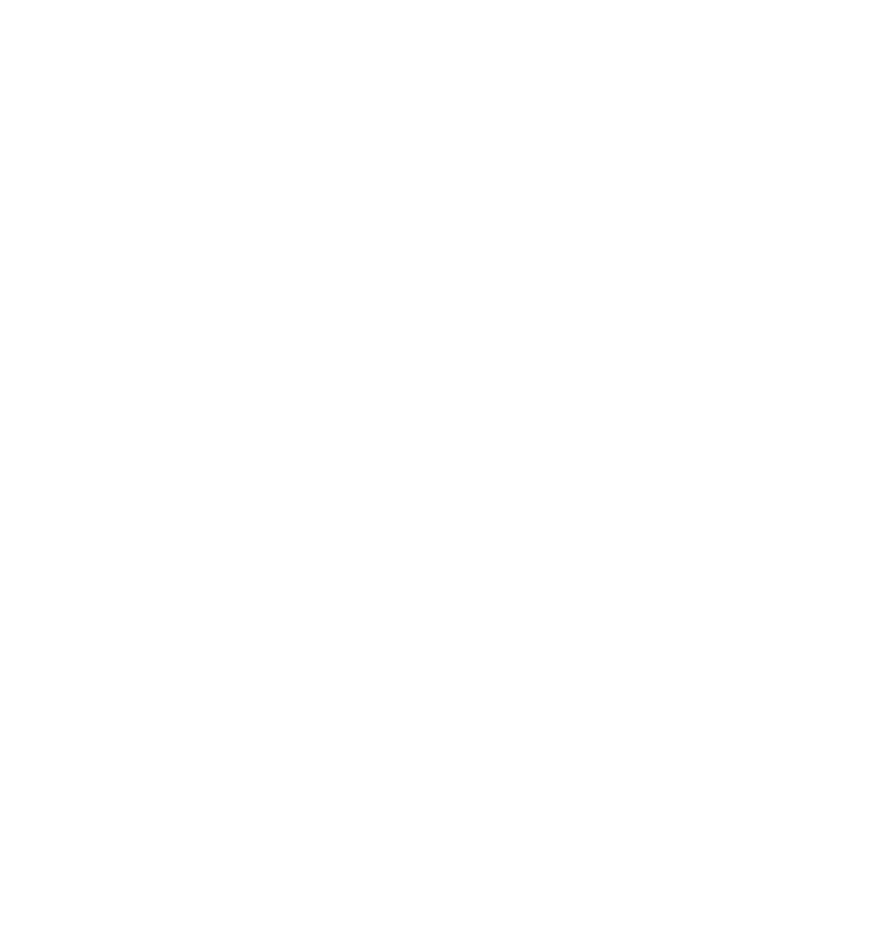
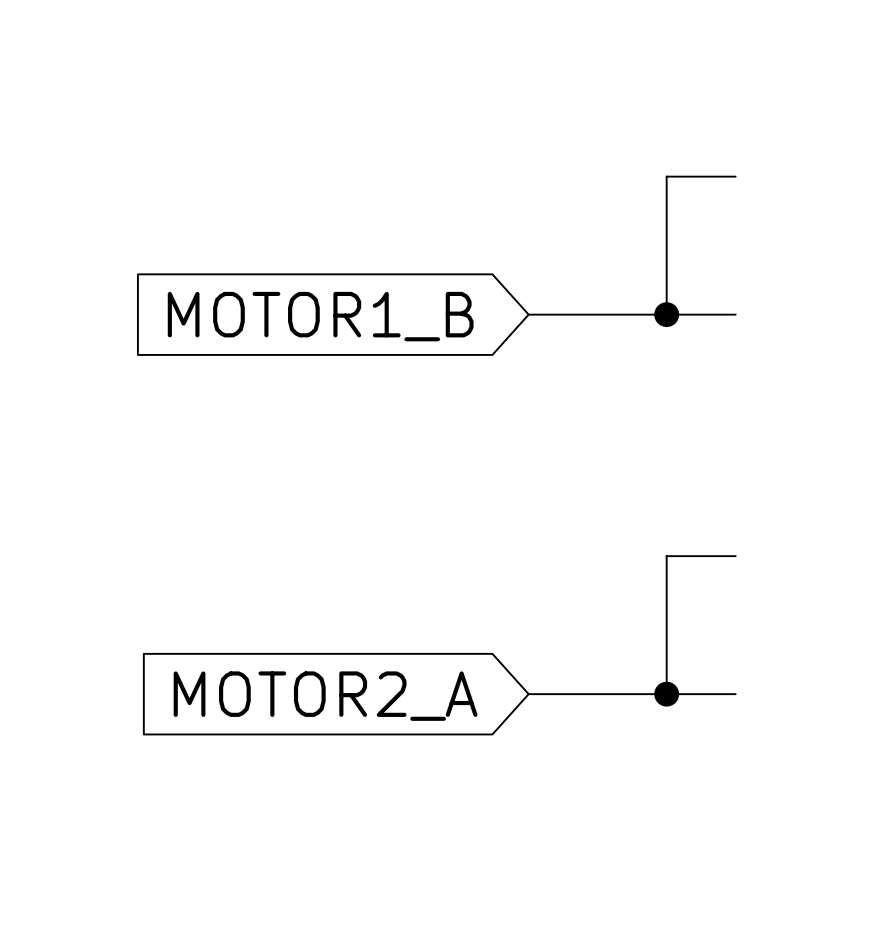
wire: none -> (735, 176) (666, 176) (666, 314)
wire: none -> (528, 314) (735, 314)
junction: none -> (666, 314)
global label: none -> MOTOR1_B (320, 316)
wire: none -> (735, 556) (666, 556) (666, 694)
wire: none -> (528, 694) (735, 694)
junction: none -> (666, 694)
global label: none -> MOTOR2_A (325, 696)

